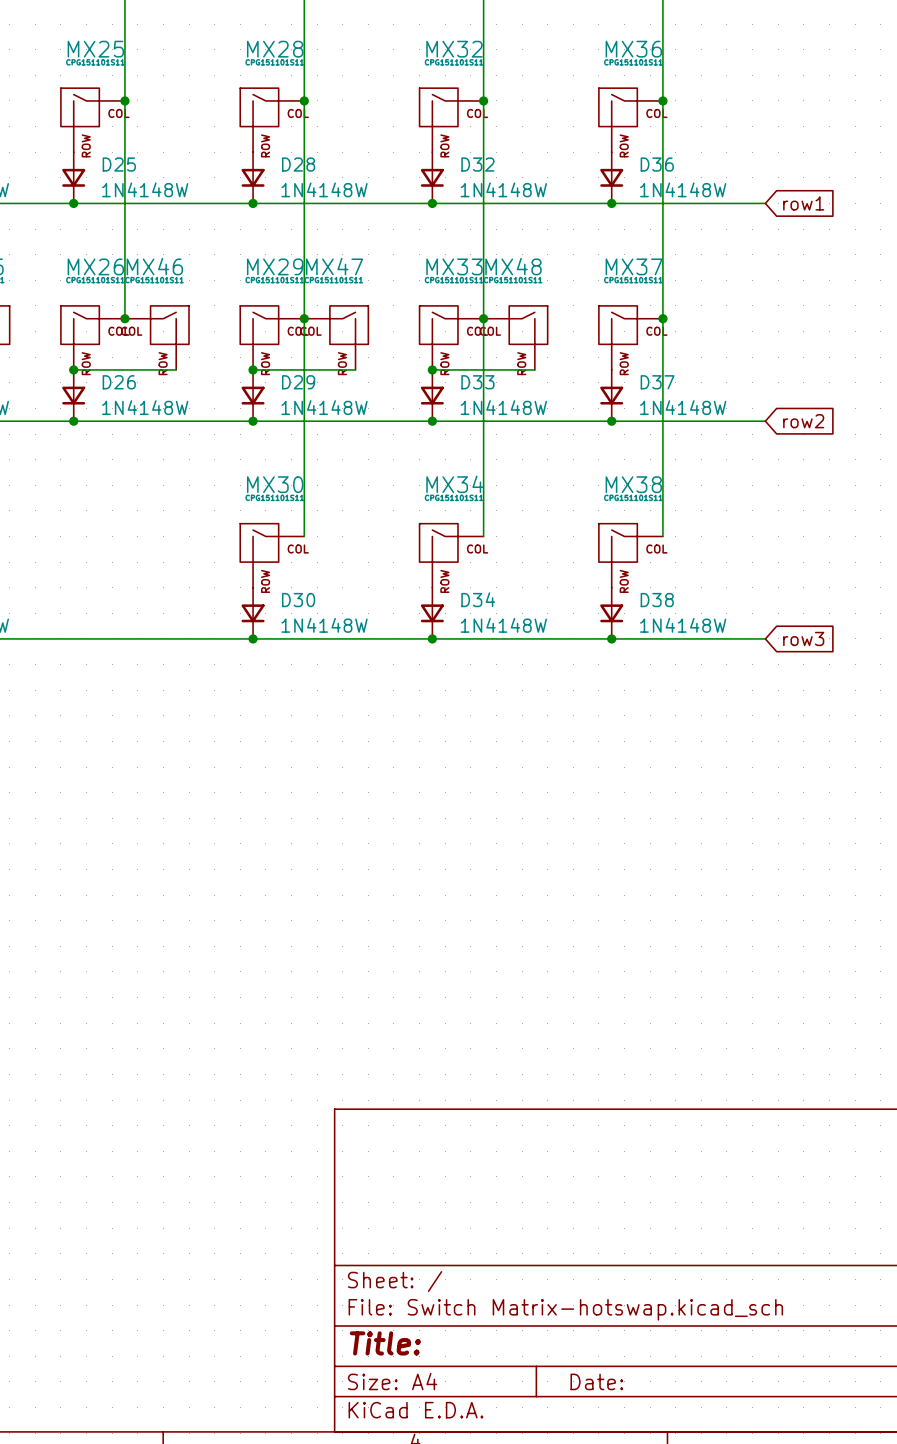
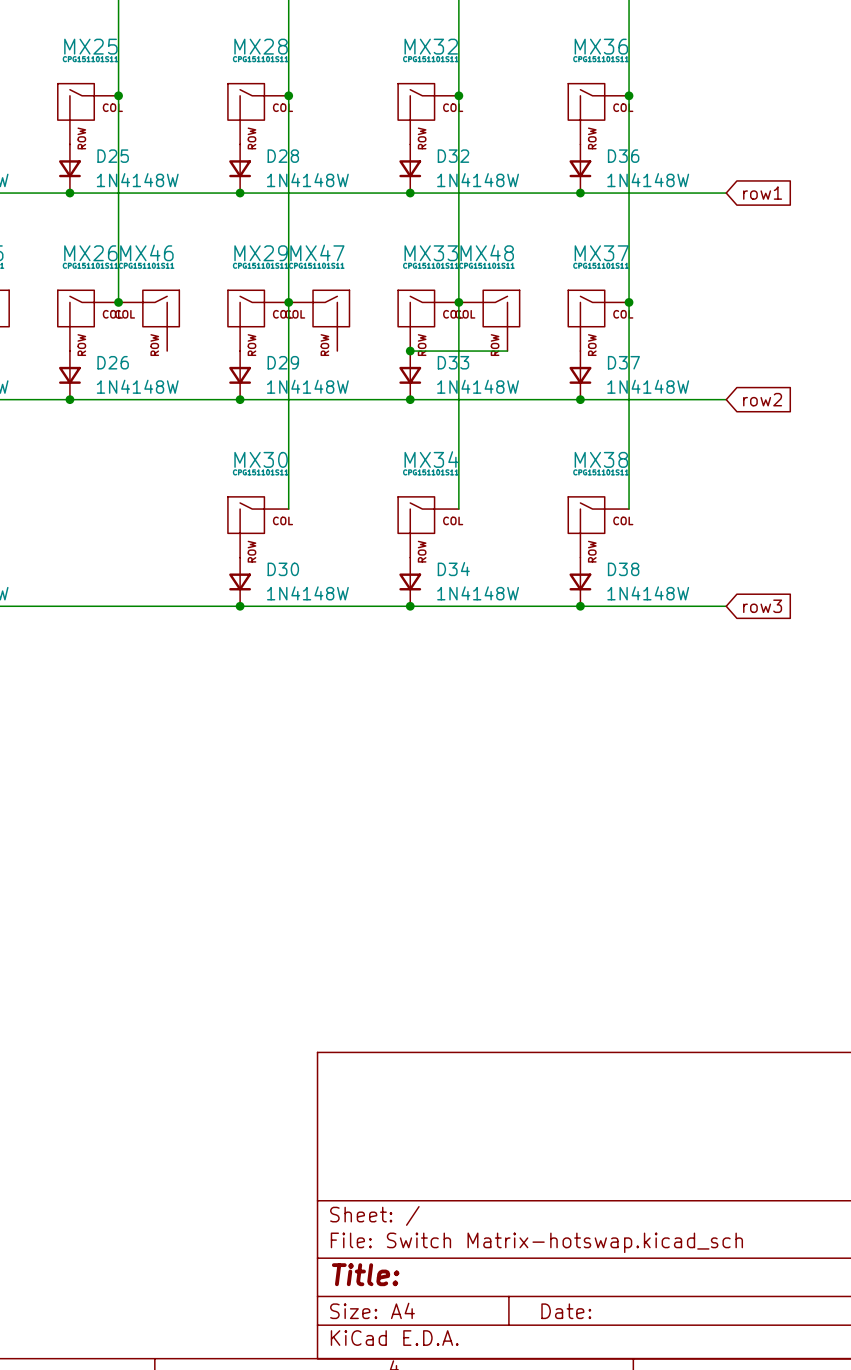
wire: (73, 369) (176, 369) -> none
junction: (73, 369) -> none
wire: (253, 369) (355, 369) -> none
junction: (253, 369) -> none

